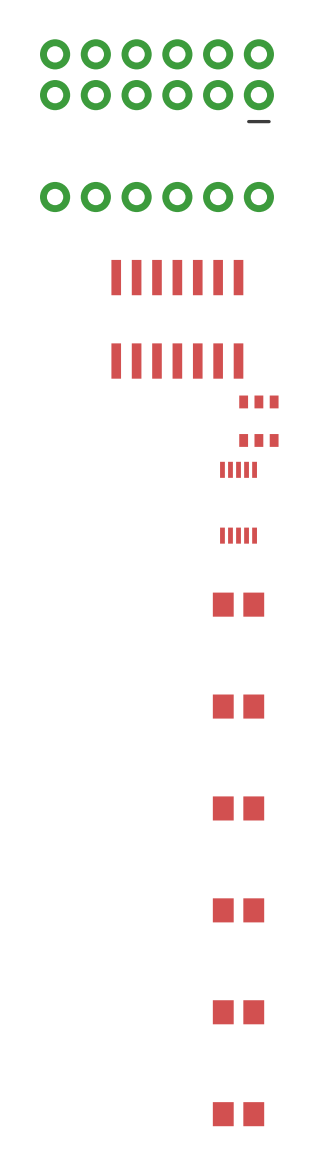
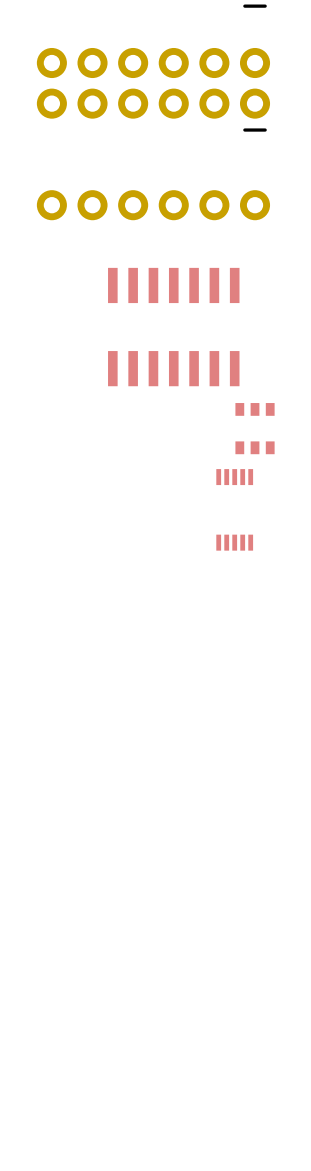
part: (238, 604) -> none
part: (238, 706) -> none
part: (238, 808) -> none
part: (238, 910) -> none
part: (238, 1012) -> none
part: (238, 1114) -> none

